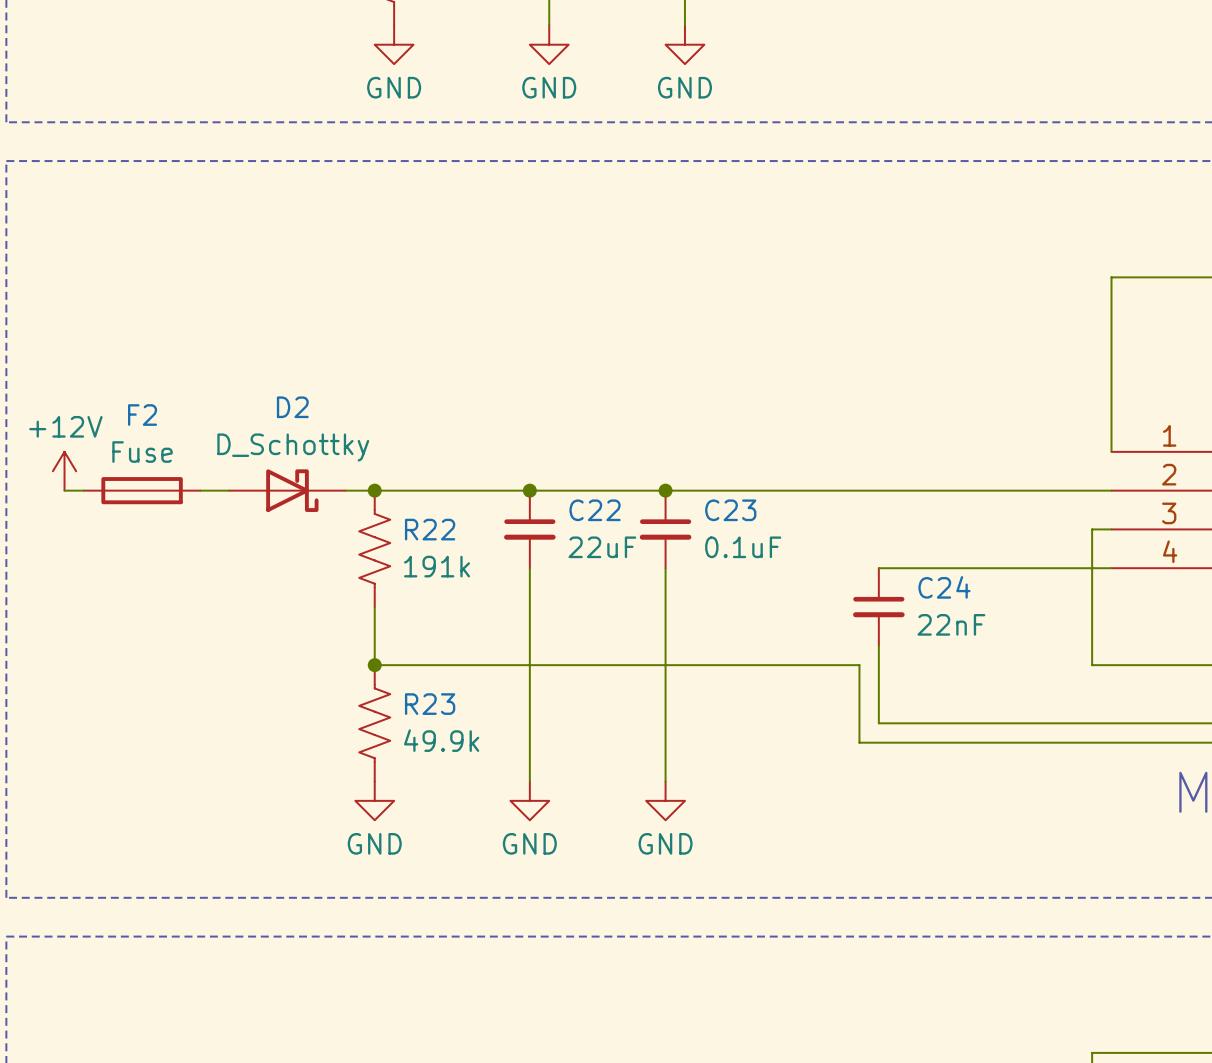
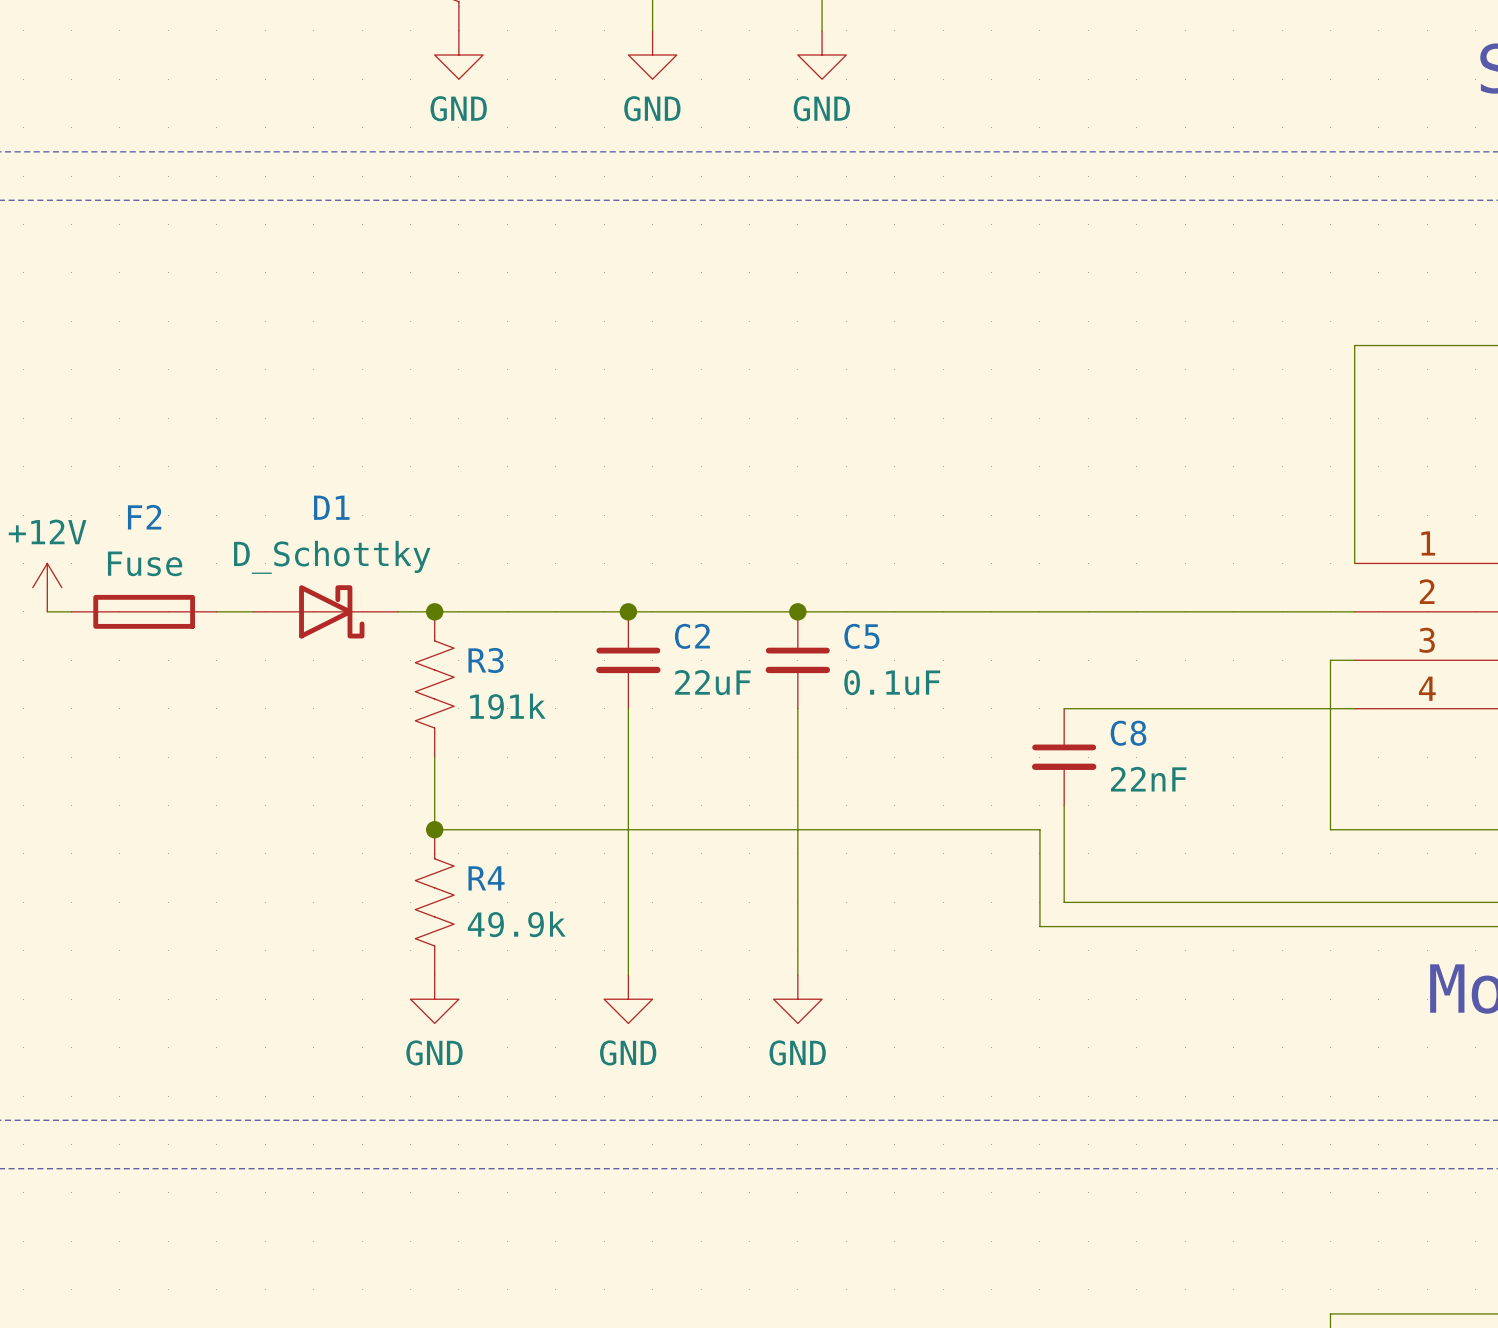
D2 name: D2 (292, 407) -> D1 (331, 507)
C22 name: C22 (595, 510) -> C2 (692, 636)
C23 name: C23 (730, 510) -> C5 (861, 636)
R22 name: R22 (430, 529) -> R3 (486, 660)
C24 name: C24 (944, 587) -> C8 (1128, 733)
R23 name: R23 (430, 704) -> R4 (486, 878)

